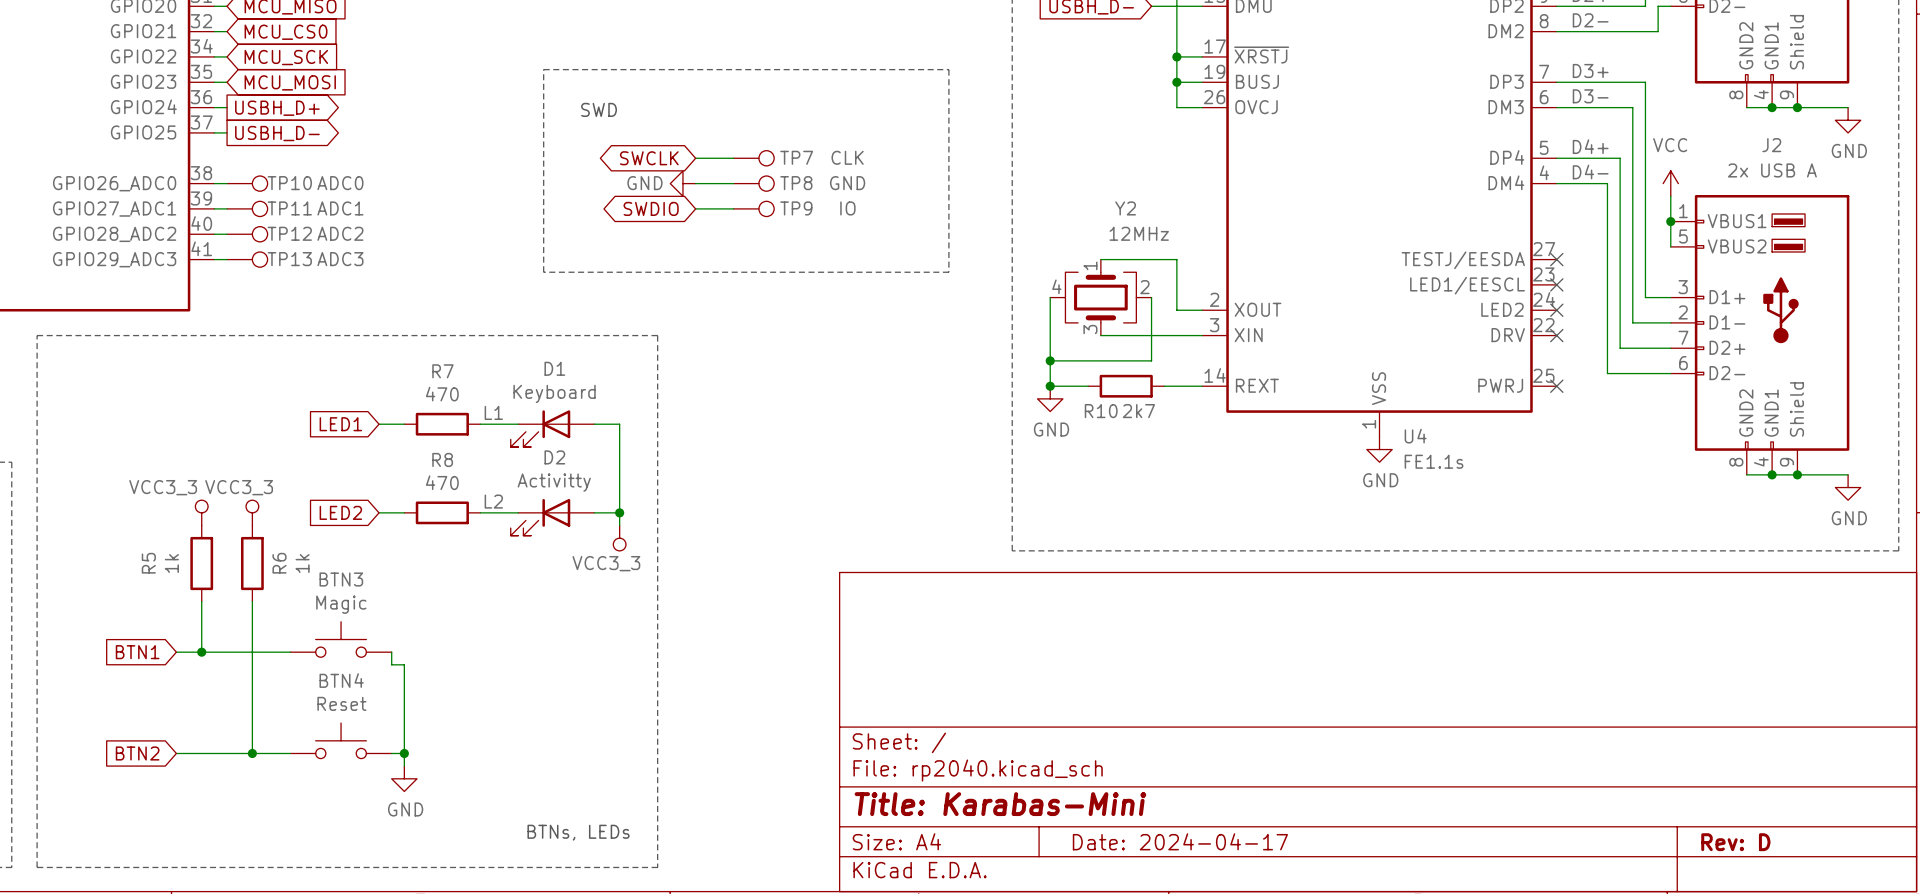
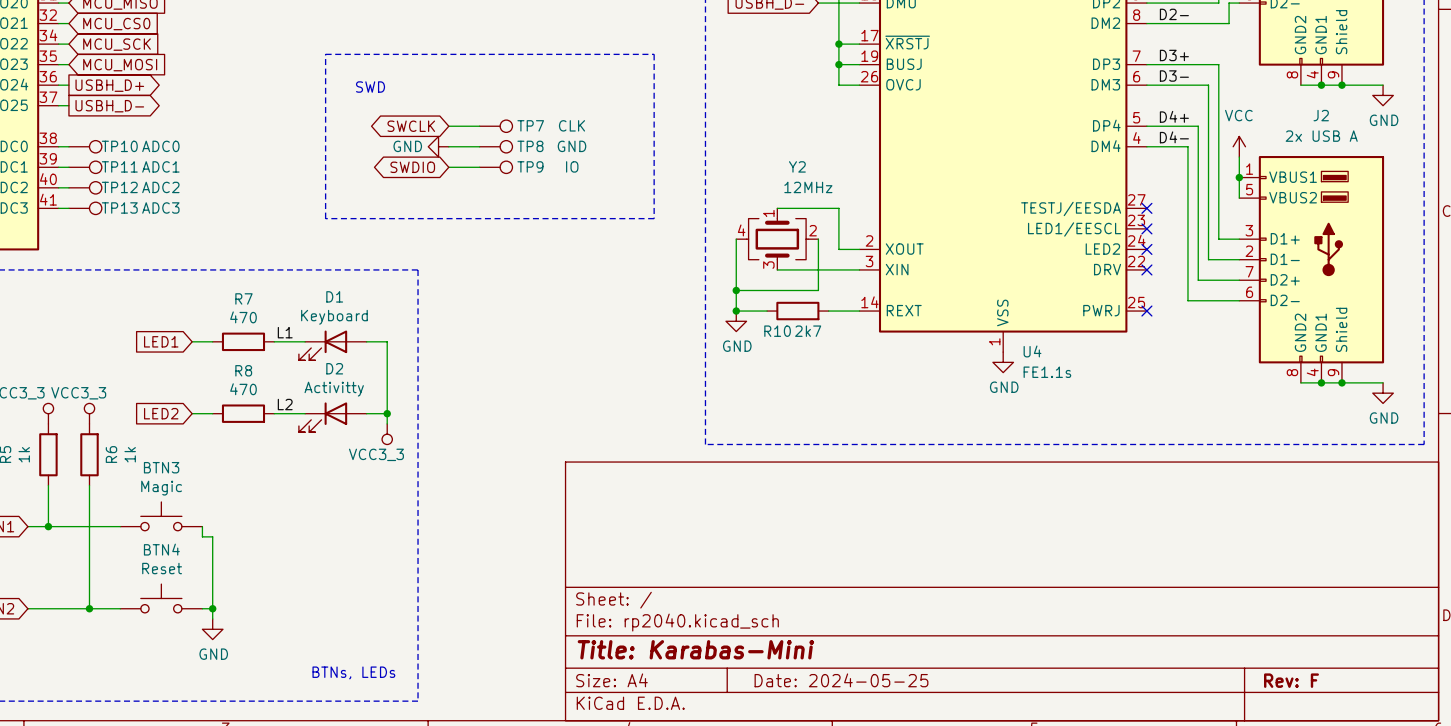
title block: Date: 2024-04-17 (1180, 841) -> Date: 2024-05-25 (841, 680)
title block: Rev: D (1735, 842) -> Rev: F (1291, 680)

